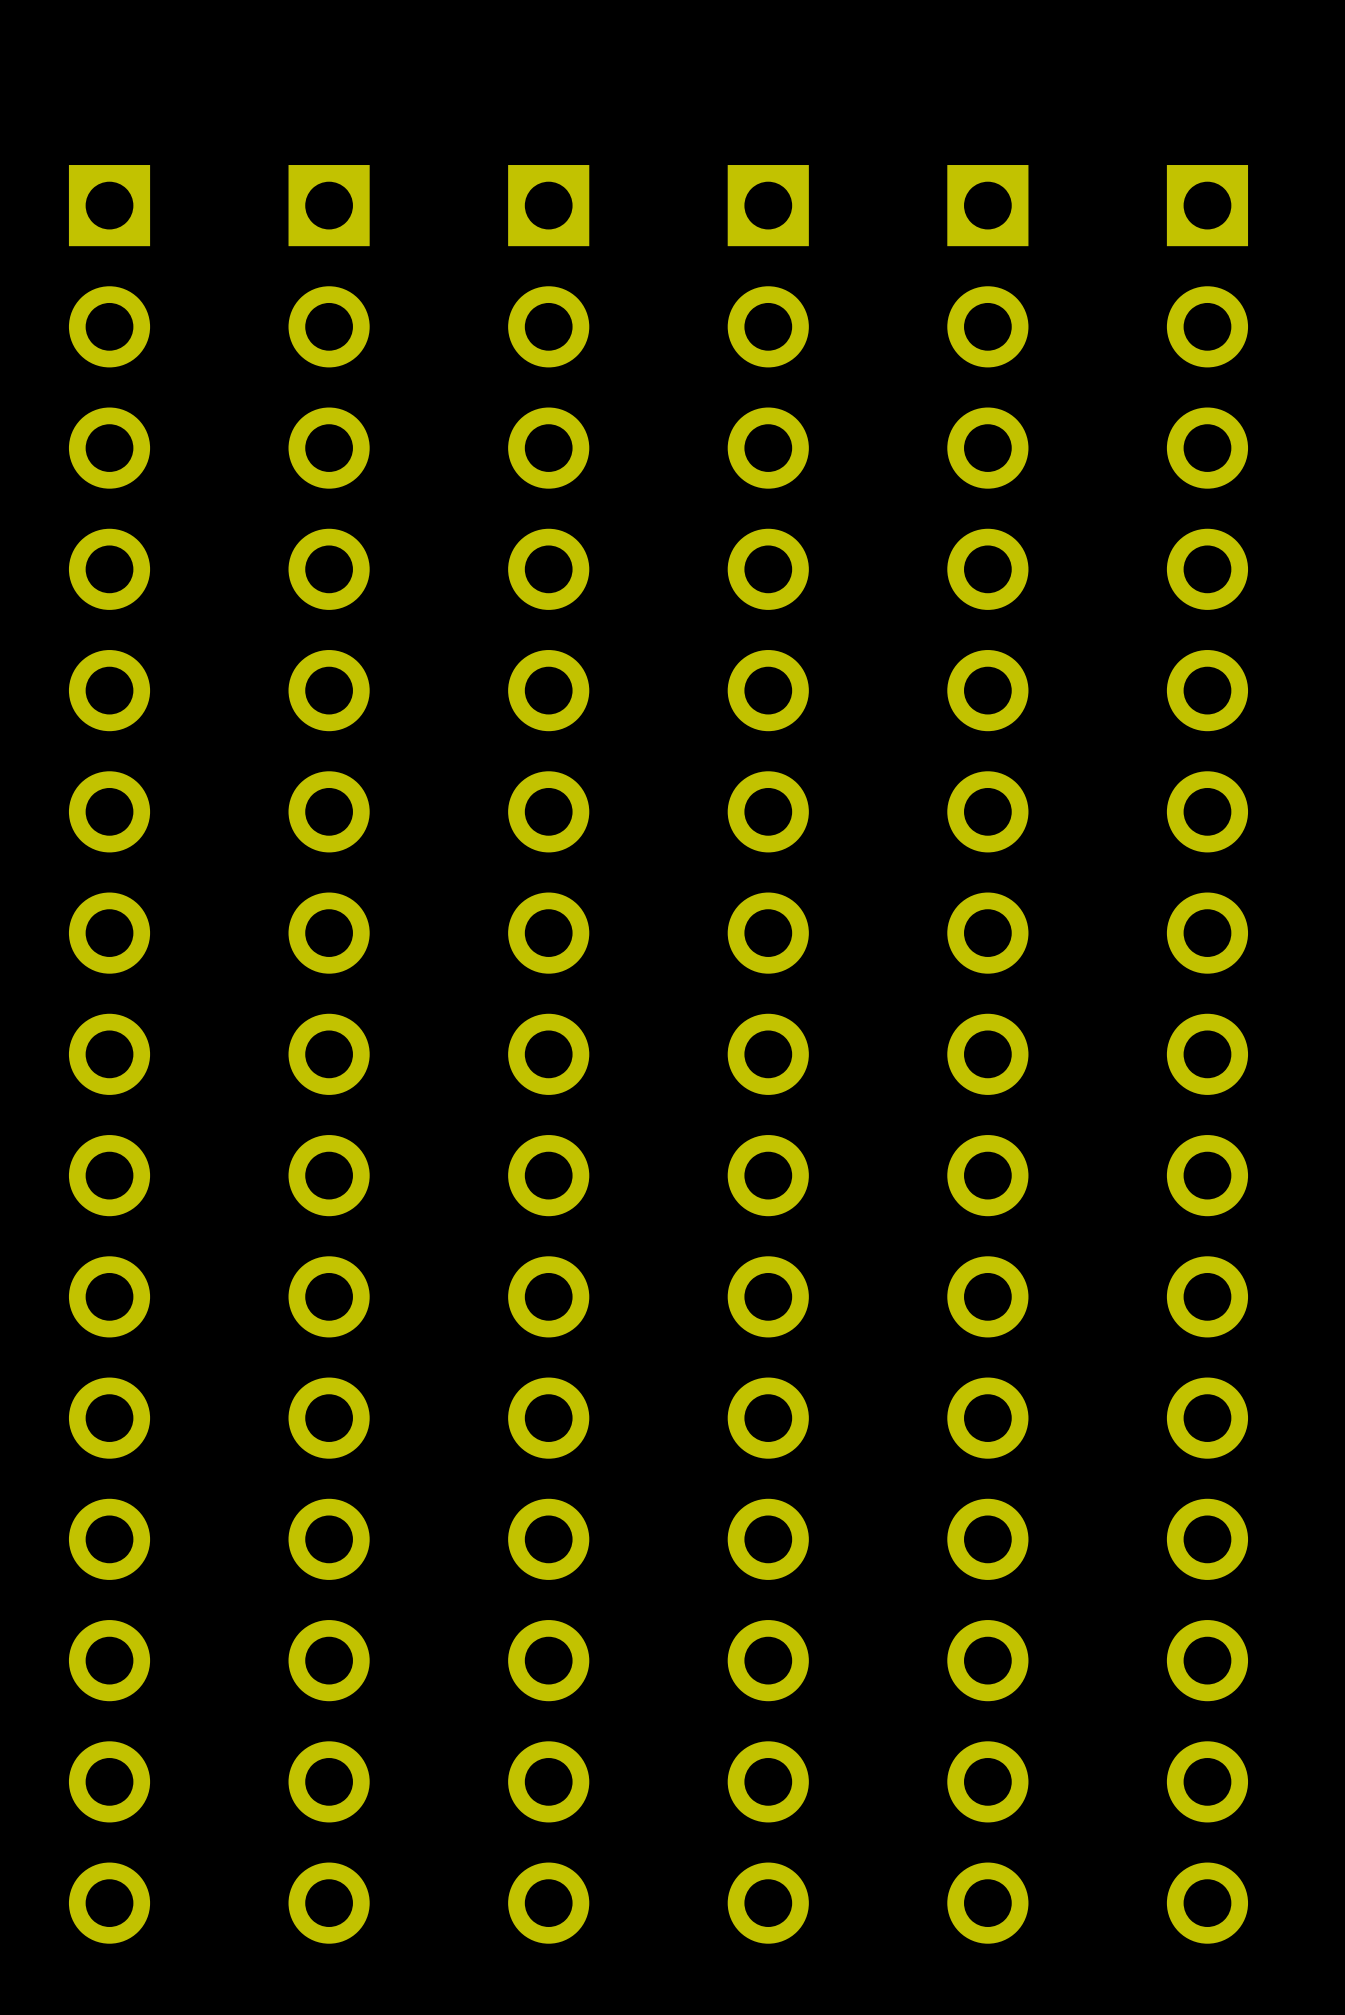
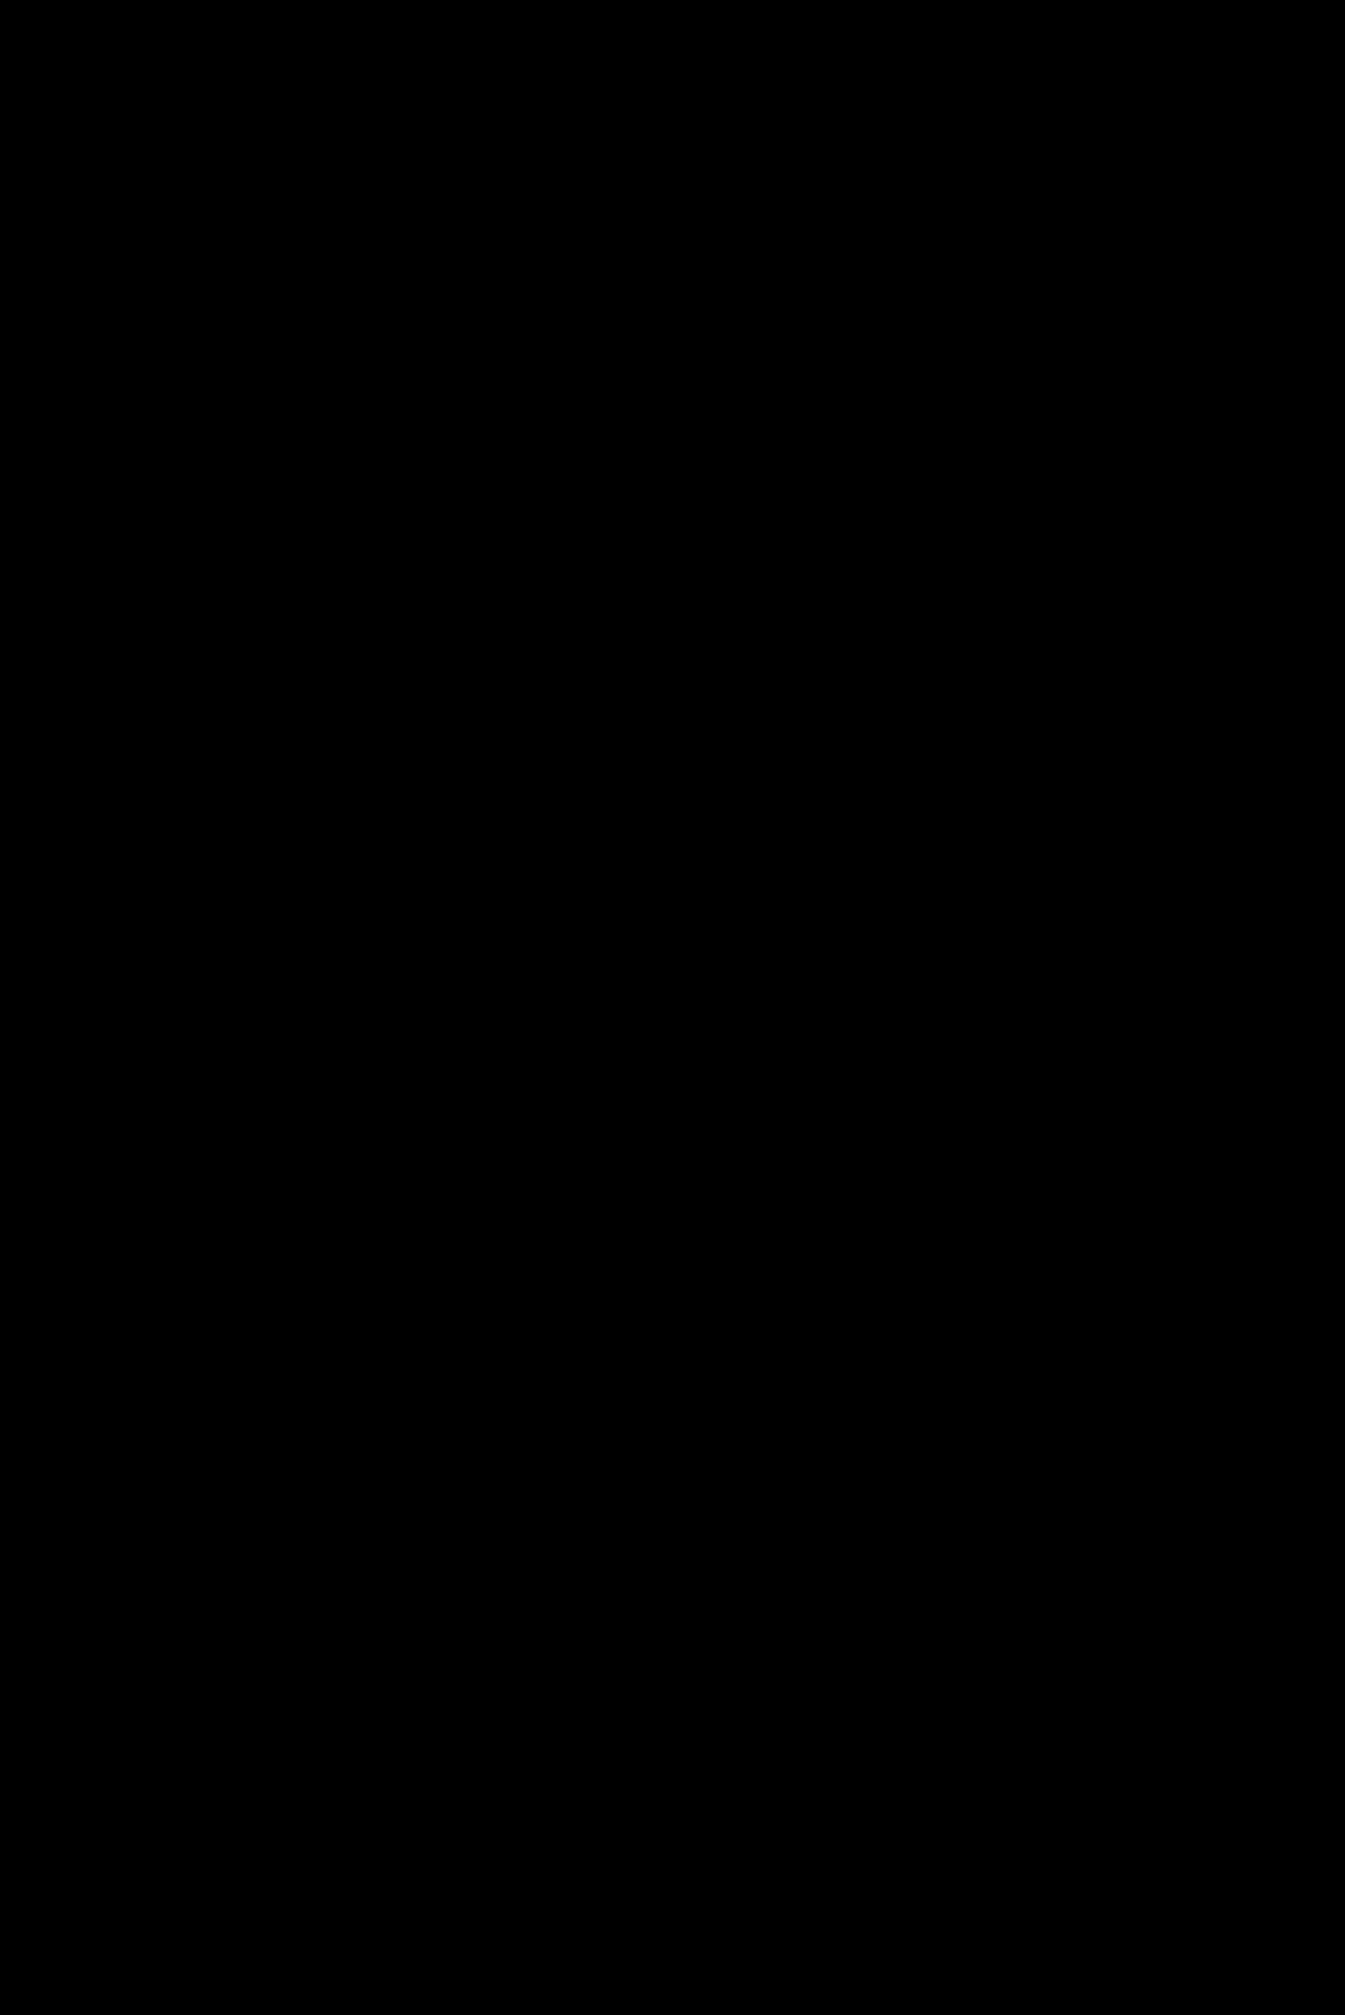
part: (109, 1054) -> none
part: (329, 1054) -> none
part: (548, 1054) -> none
part: (768, 1054) -> none
part: (987, 1054) -> none
part: (1207, 1054) -> none

